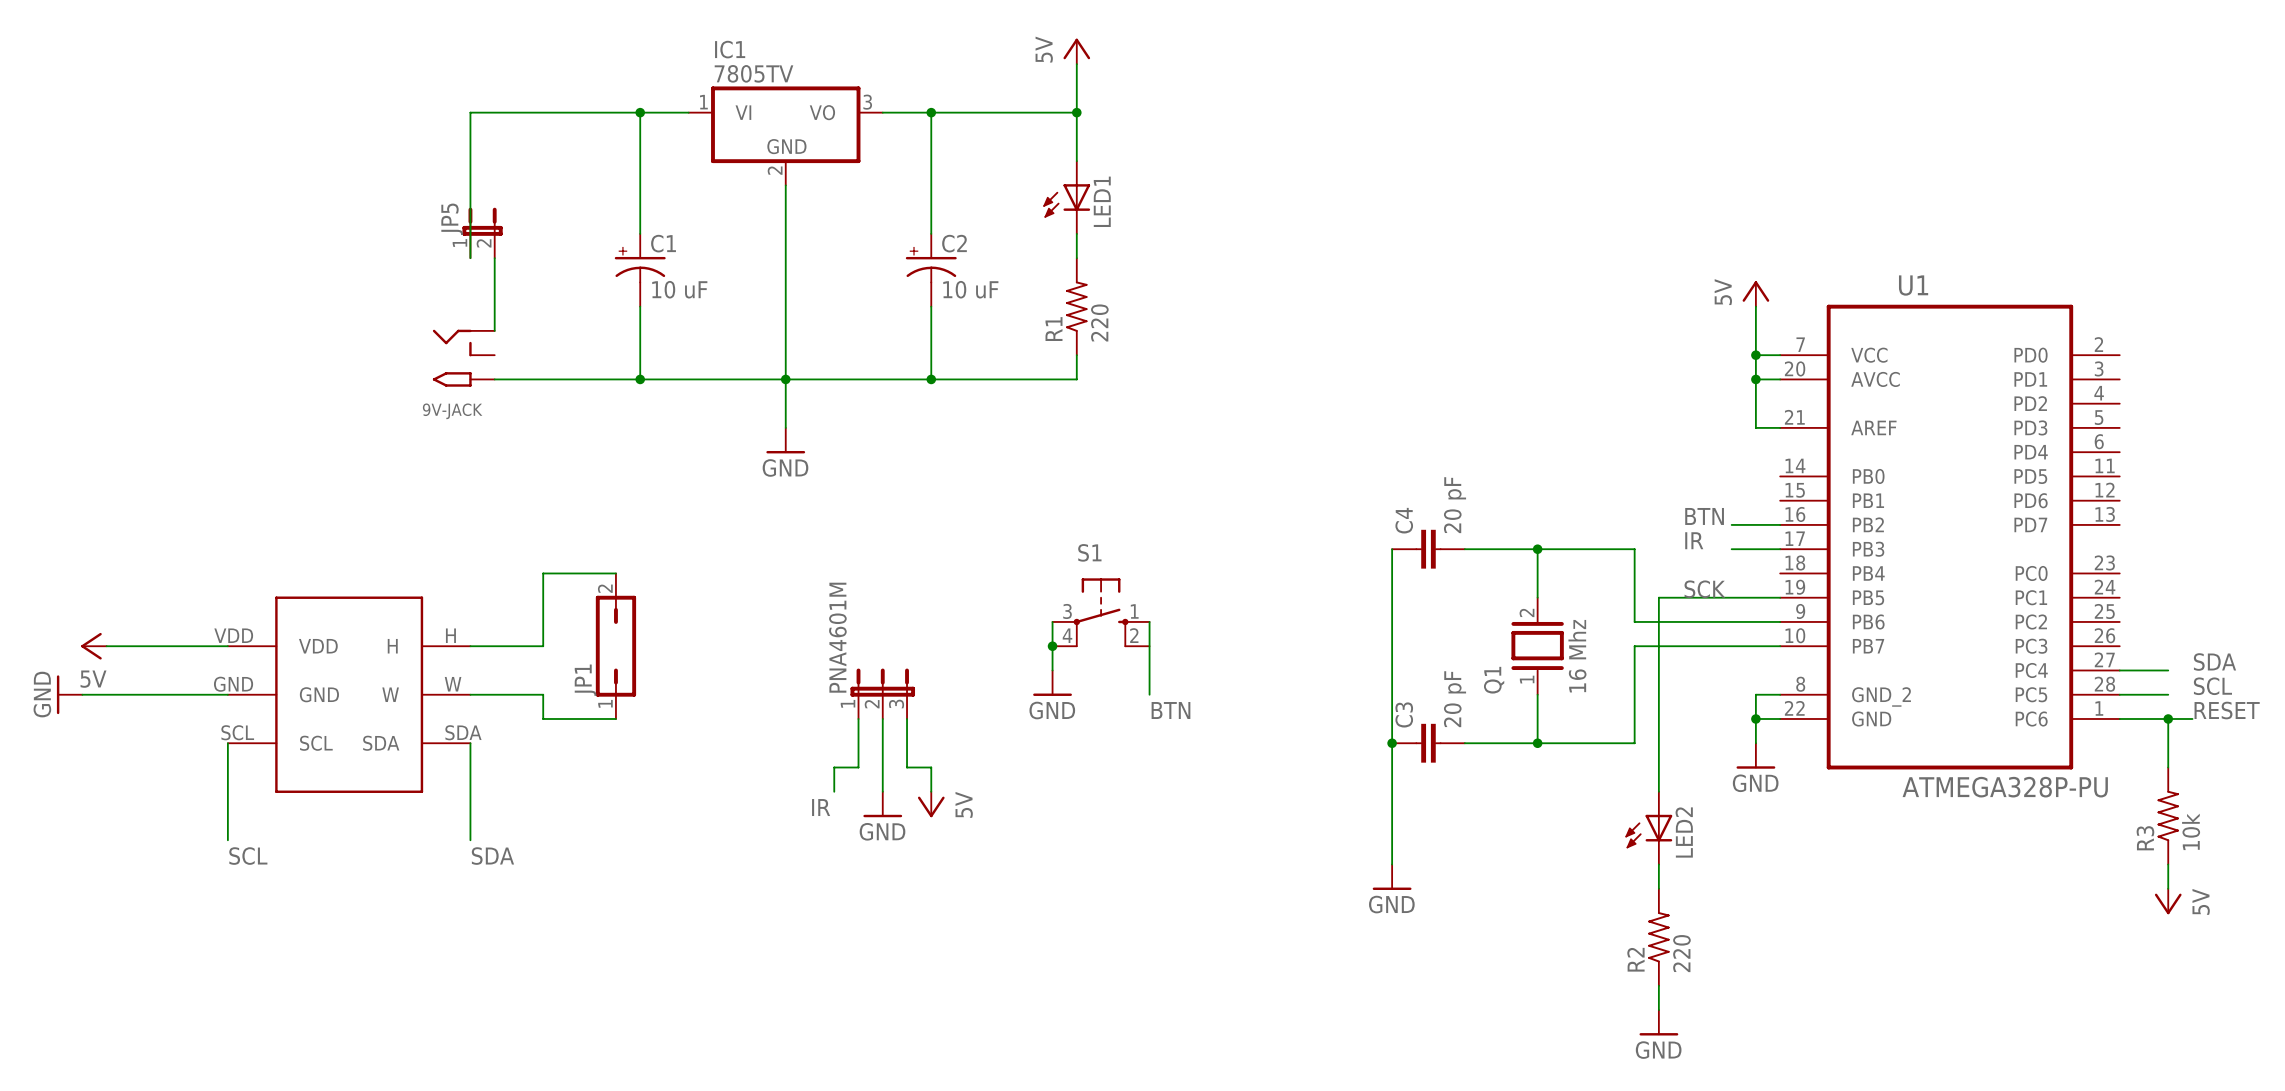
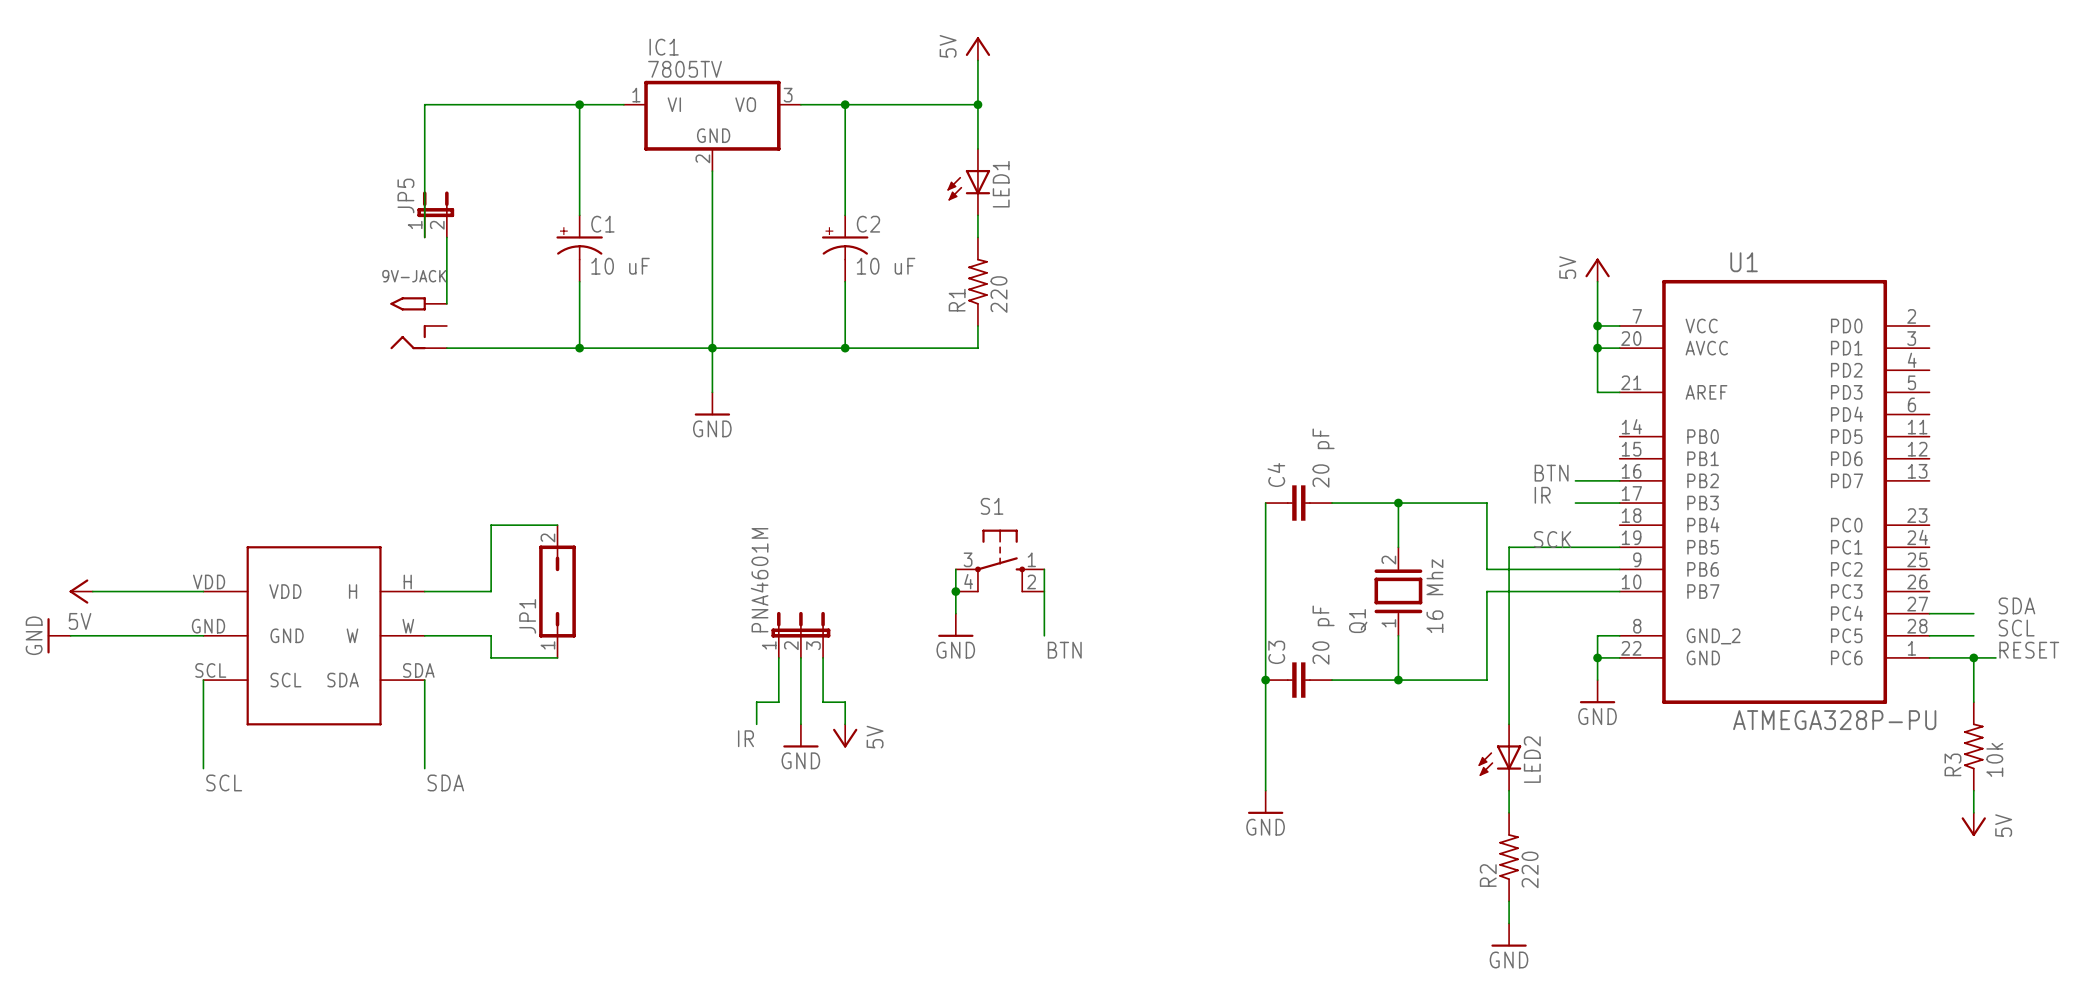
9V-JACK flip: as is (452, 358) -> up-down (408, 323)

